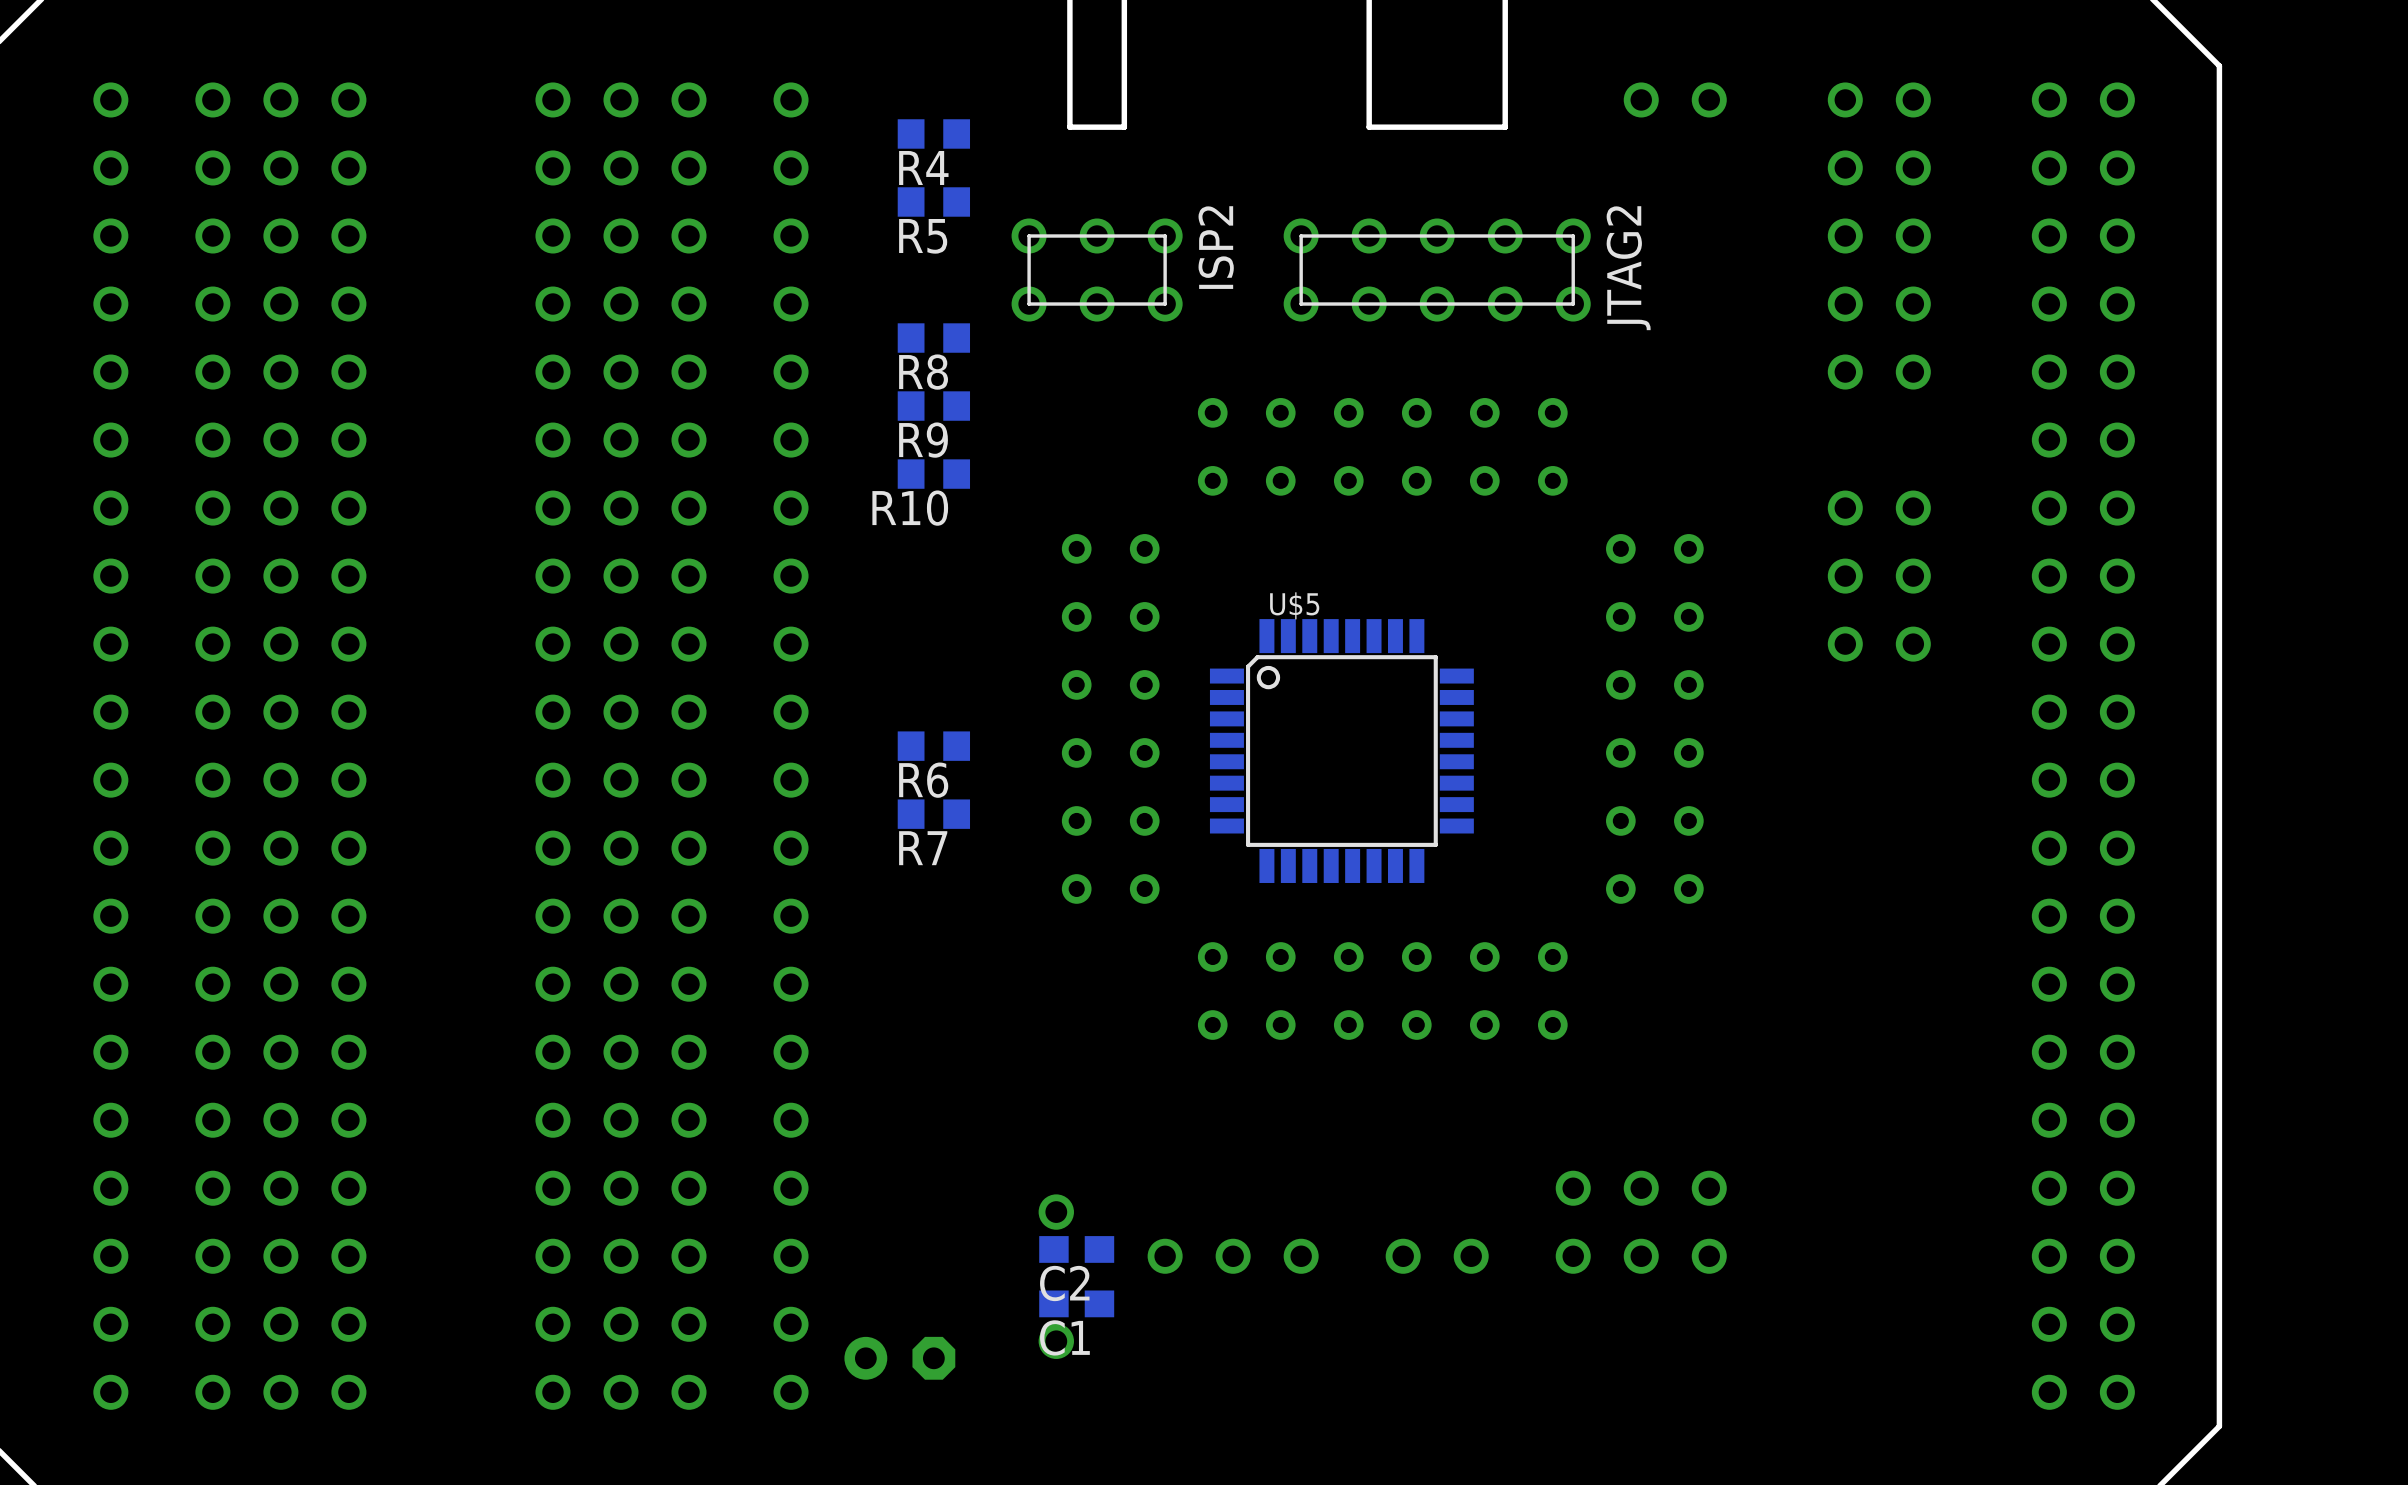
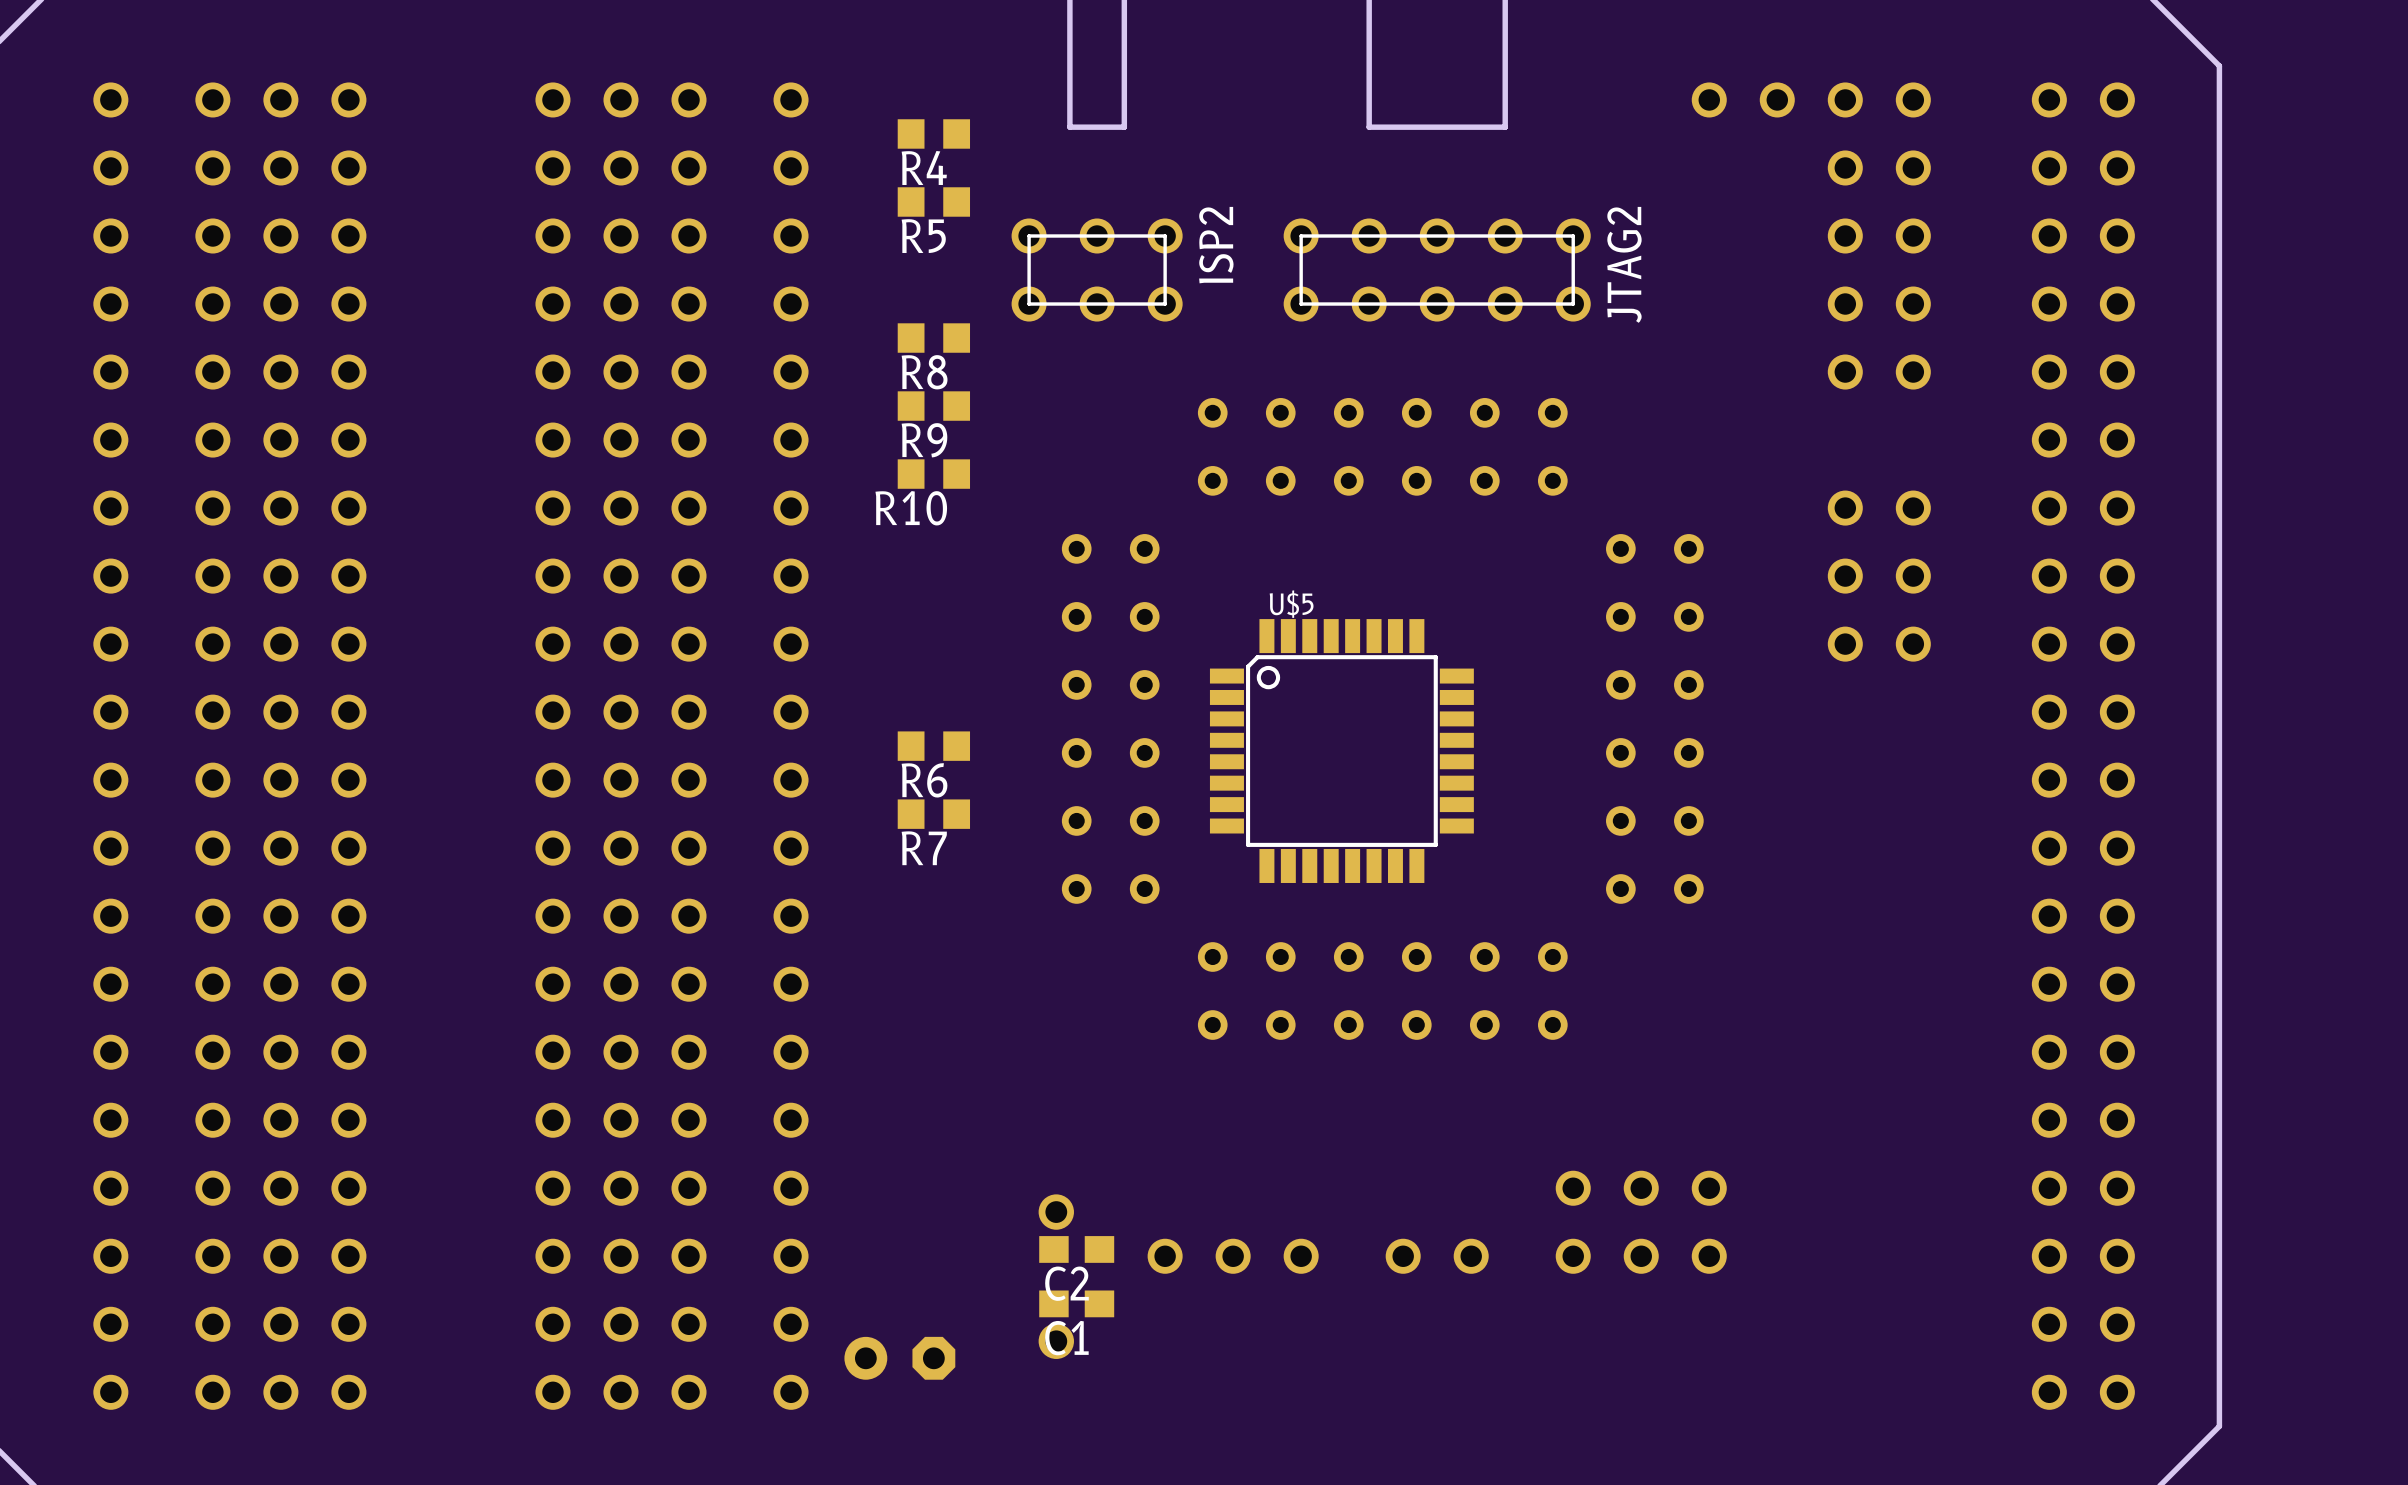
part position: (1675, 99) -> (1743, 99)

